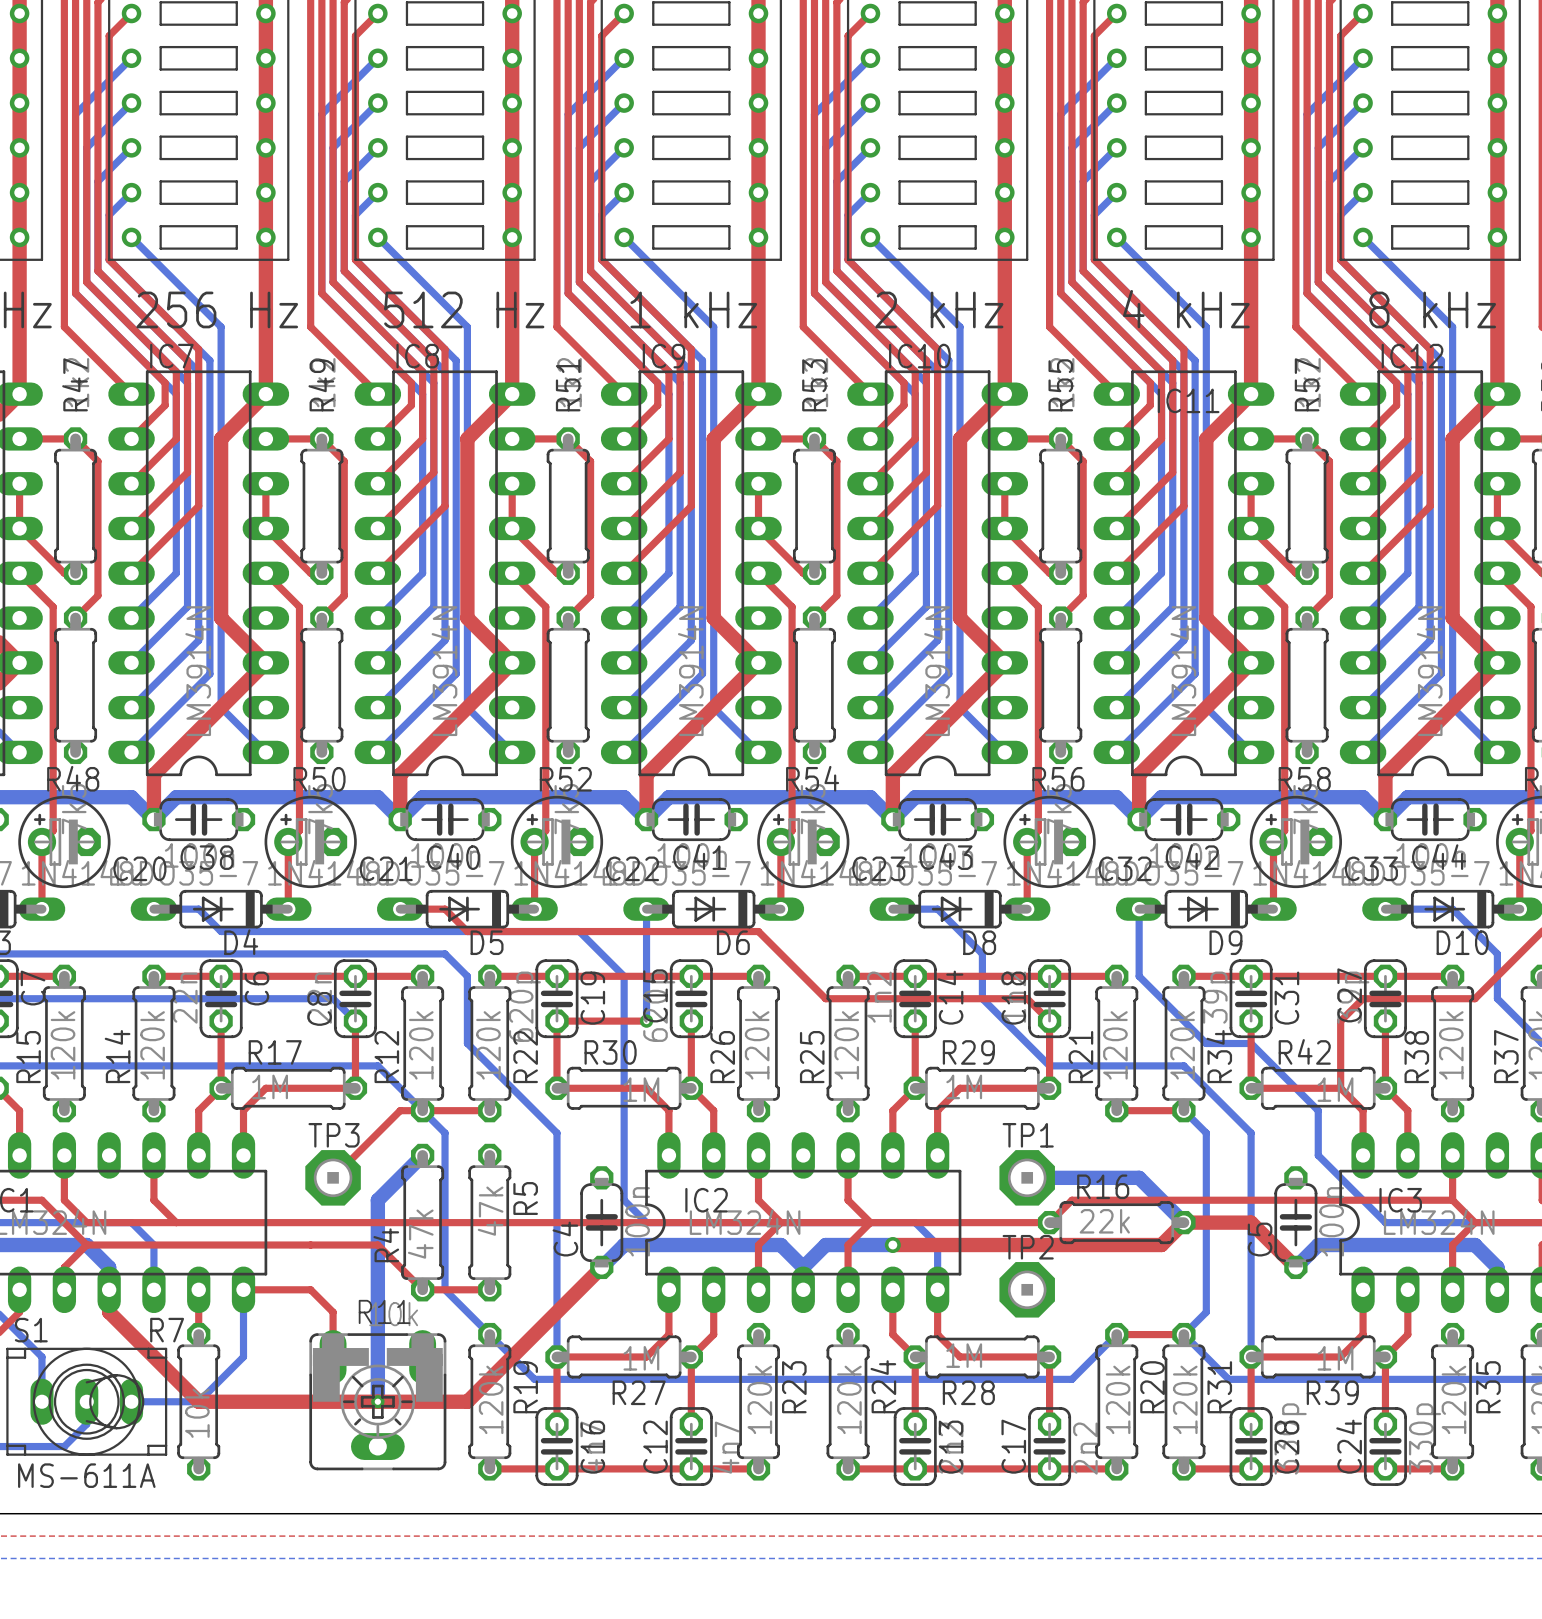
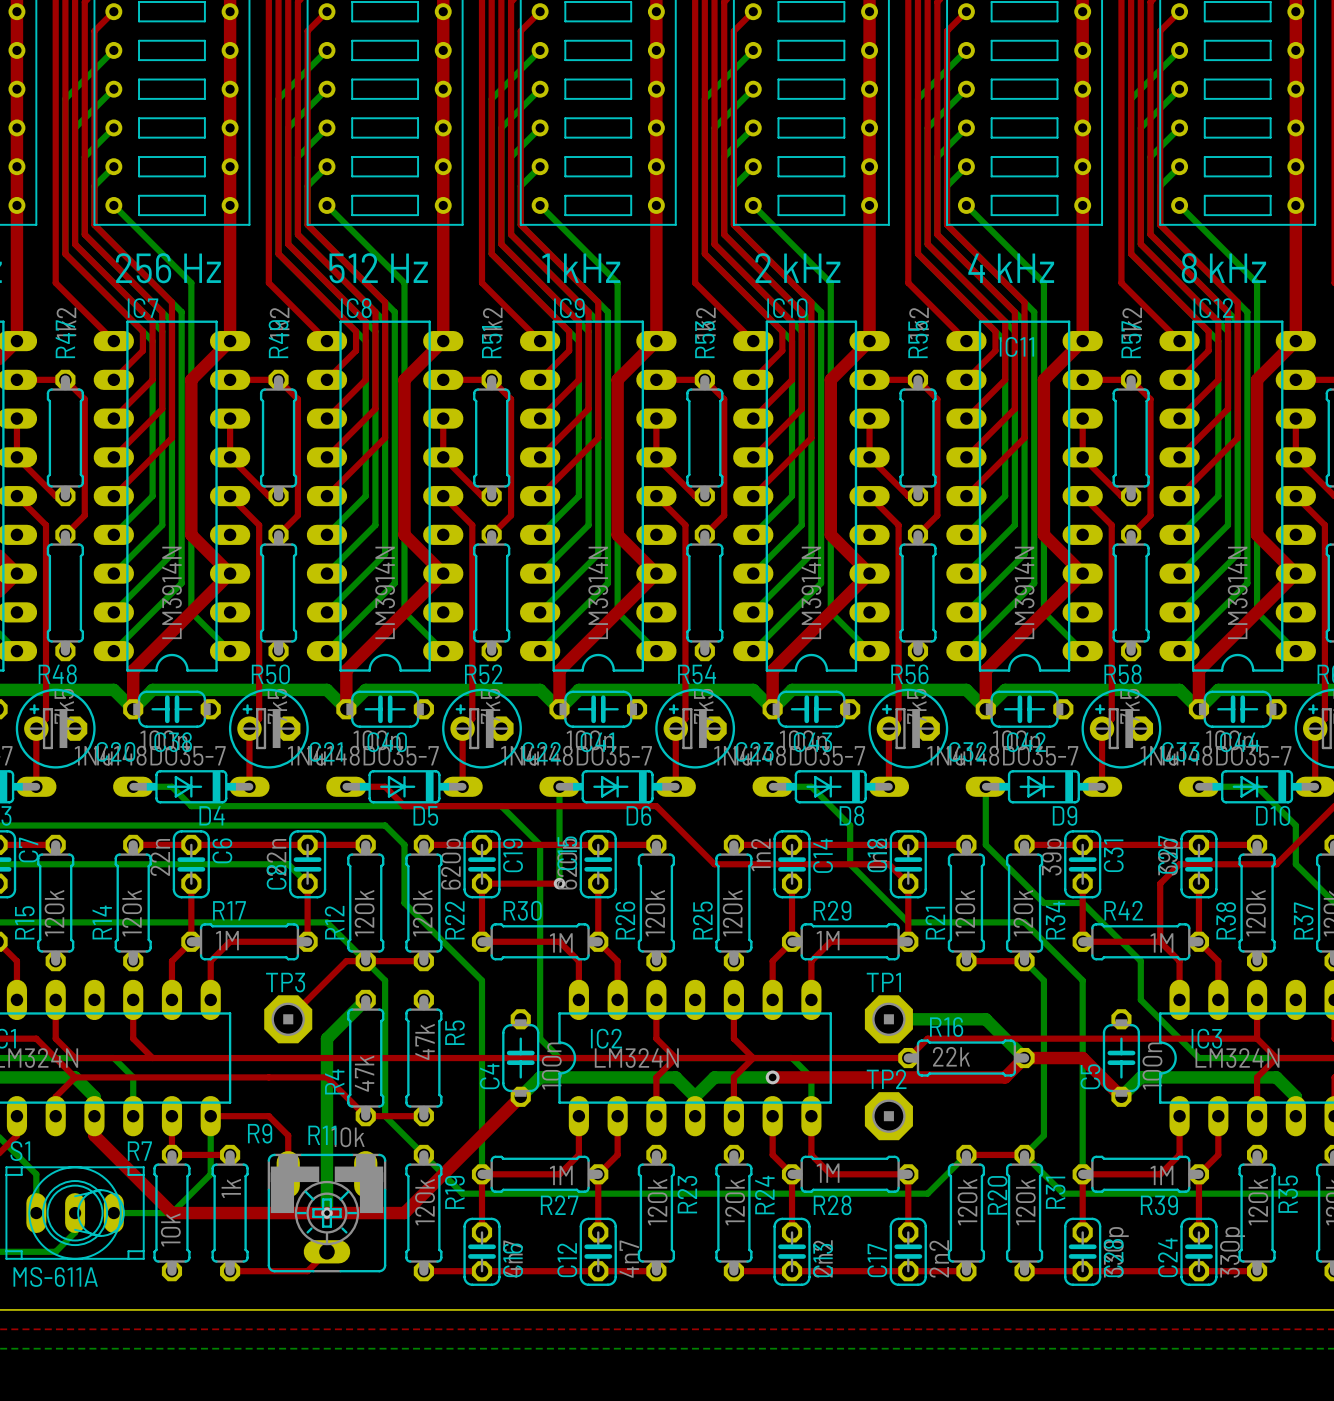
top track: none -> (171, 1154) (230, 1154)
R9: none -> 1k (230, 1213)
top track: none -> (326, 1251) (307, 1271) (230, 1271)

